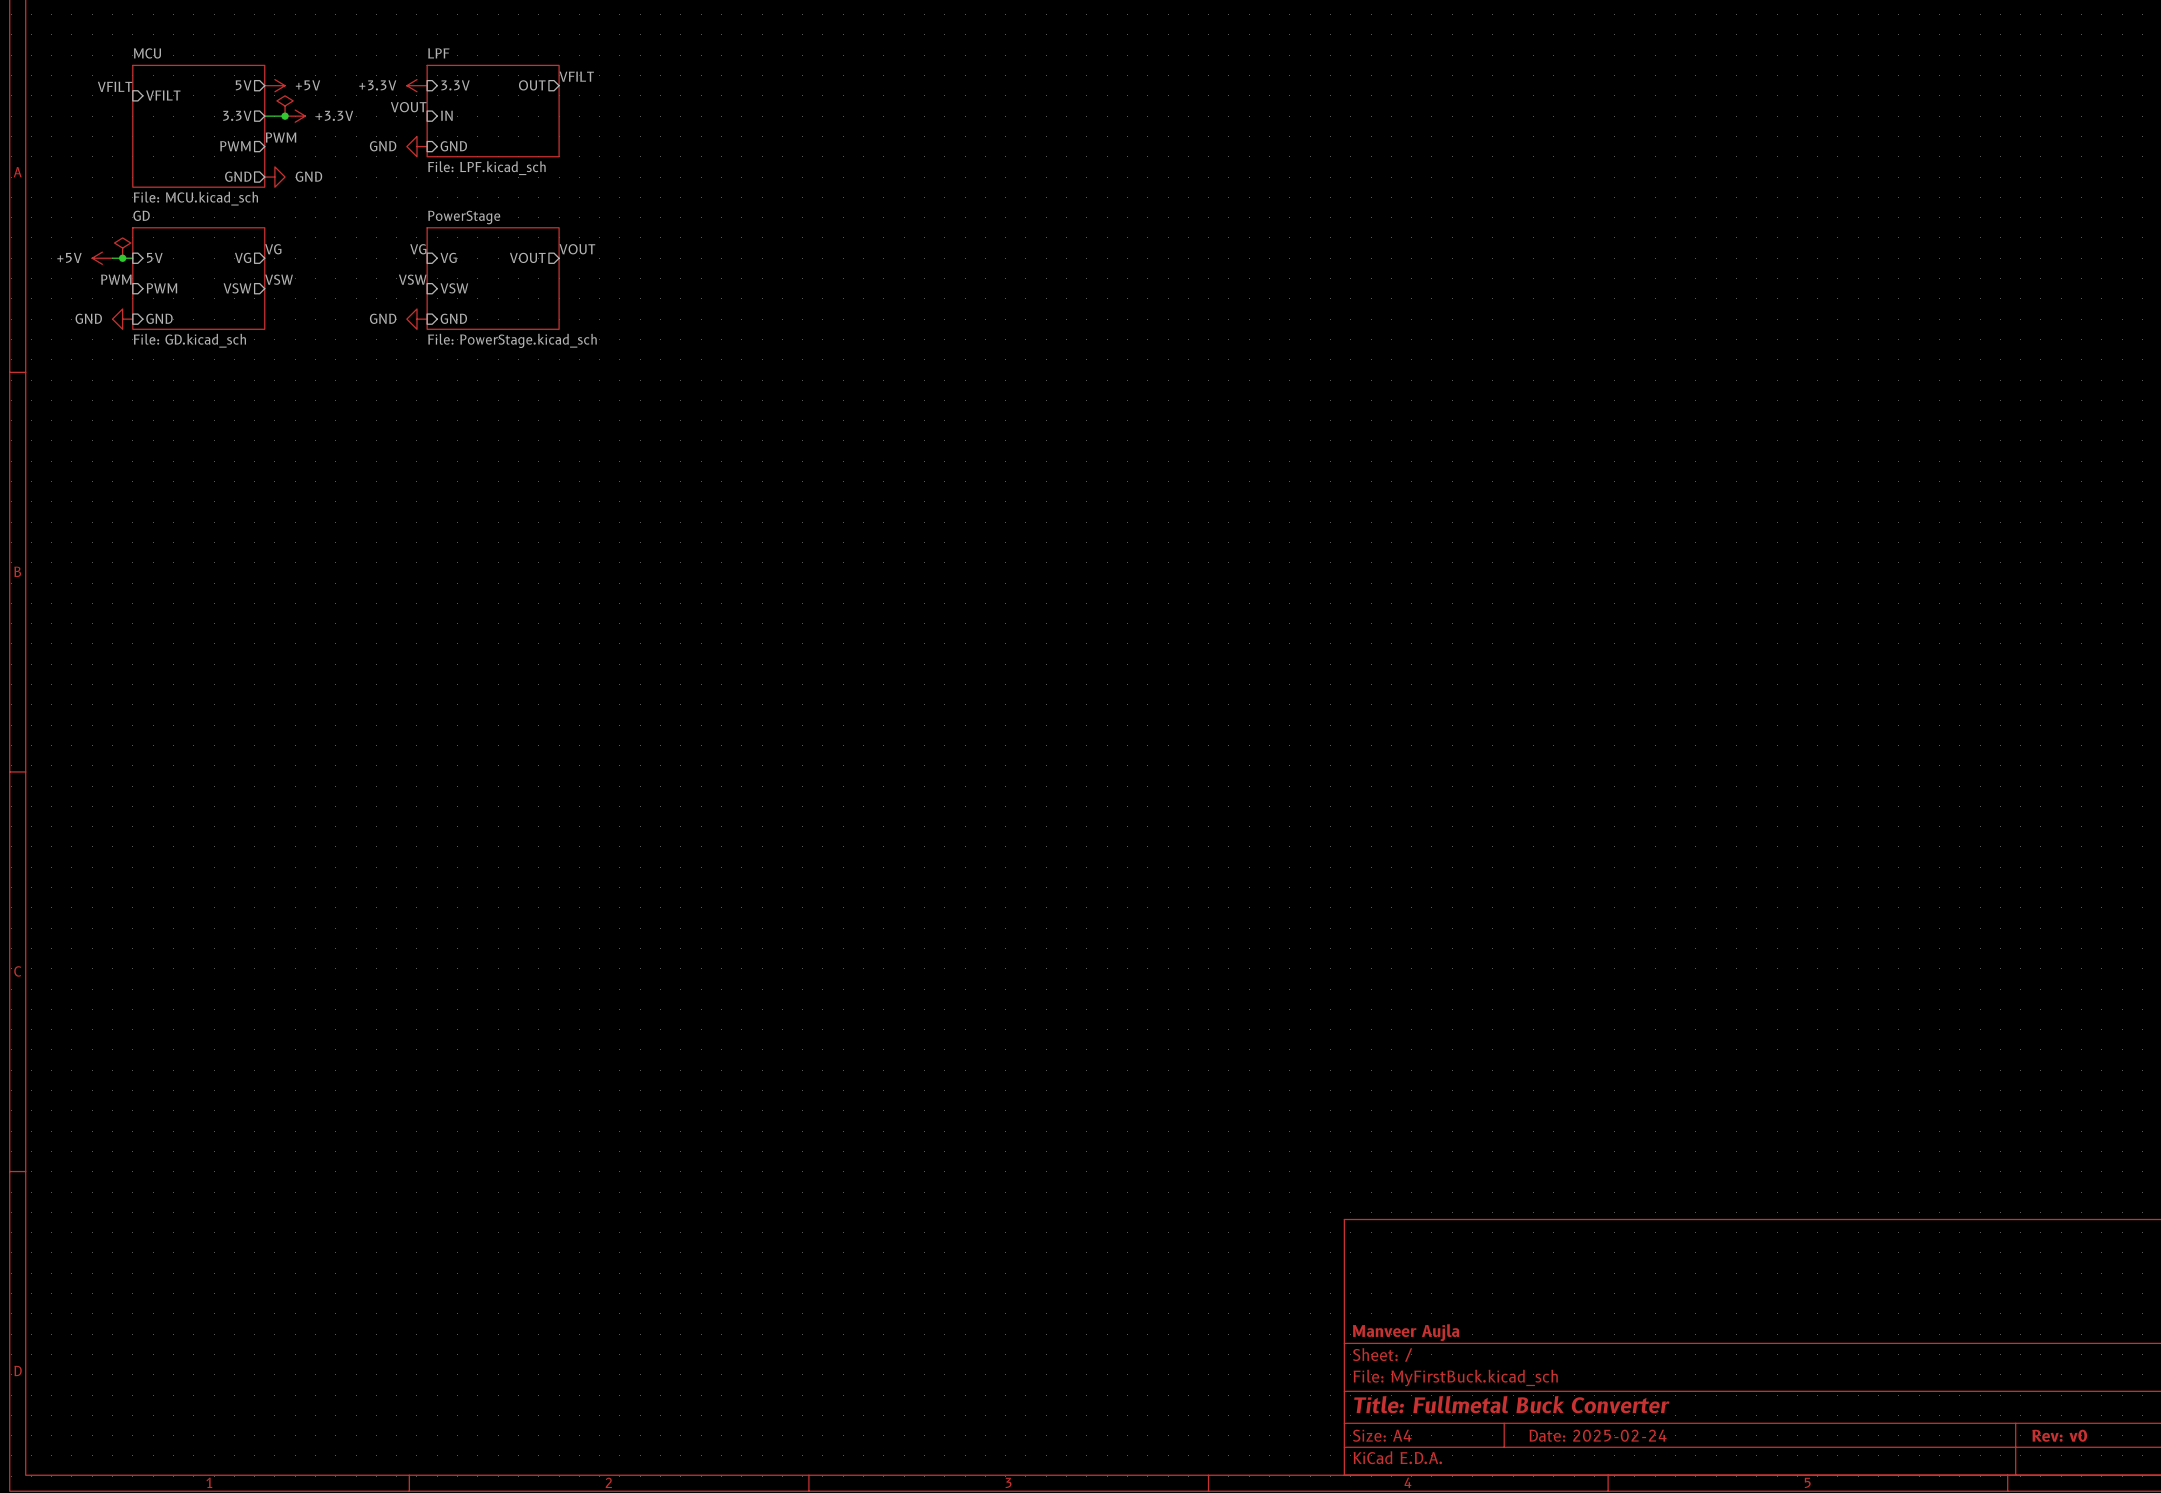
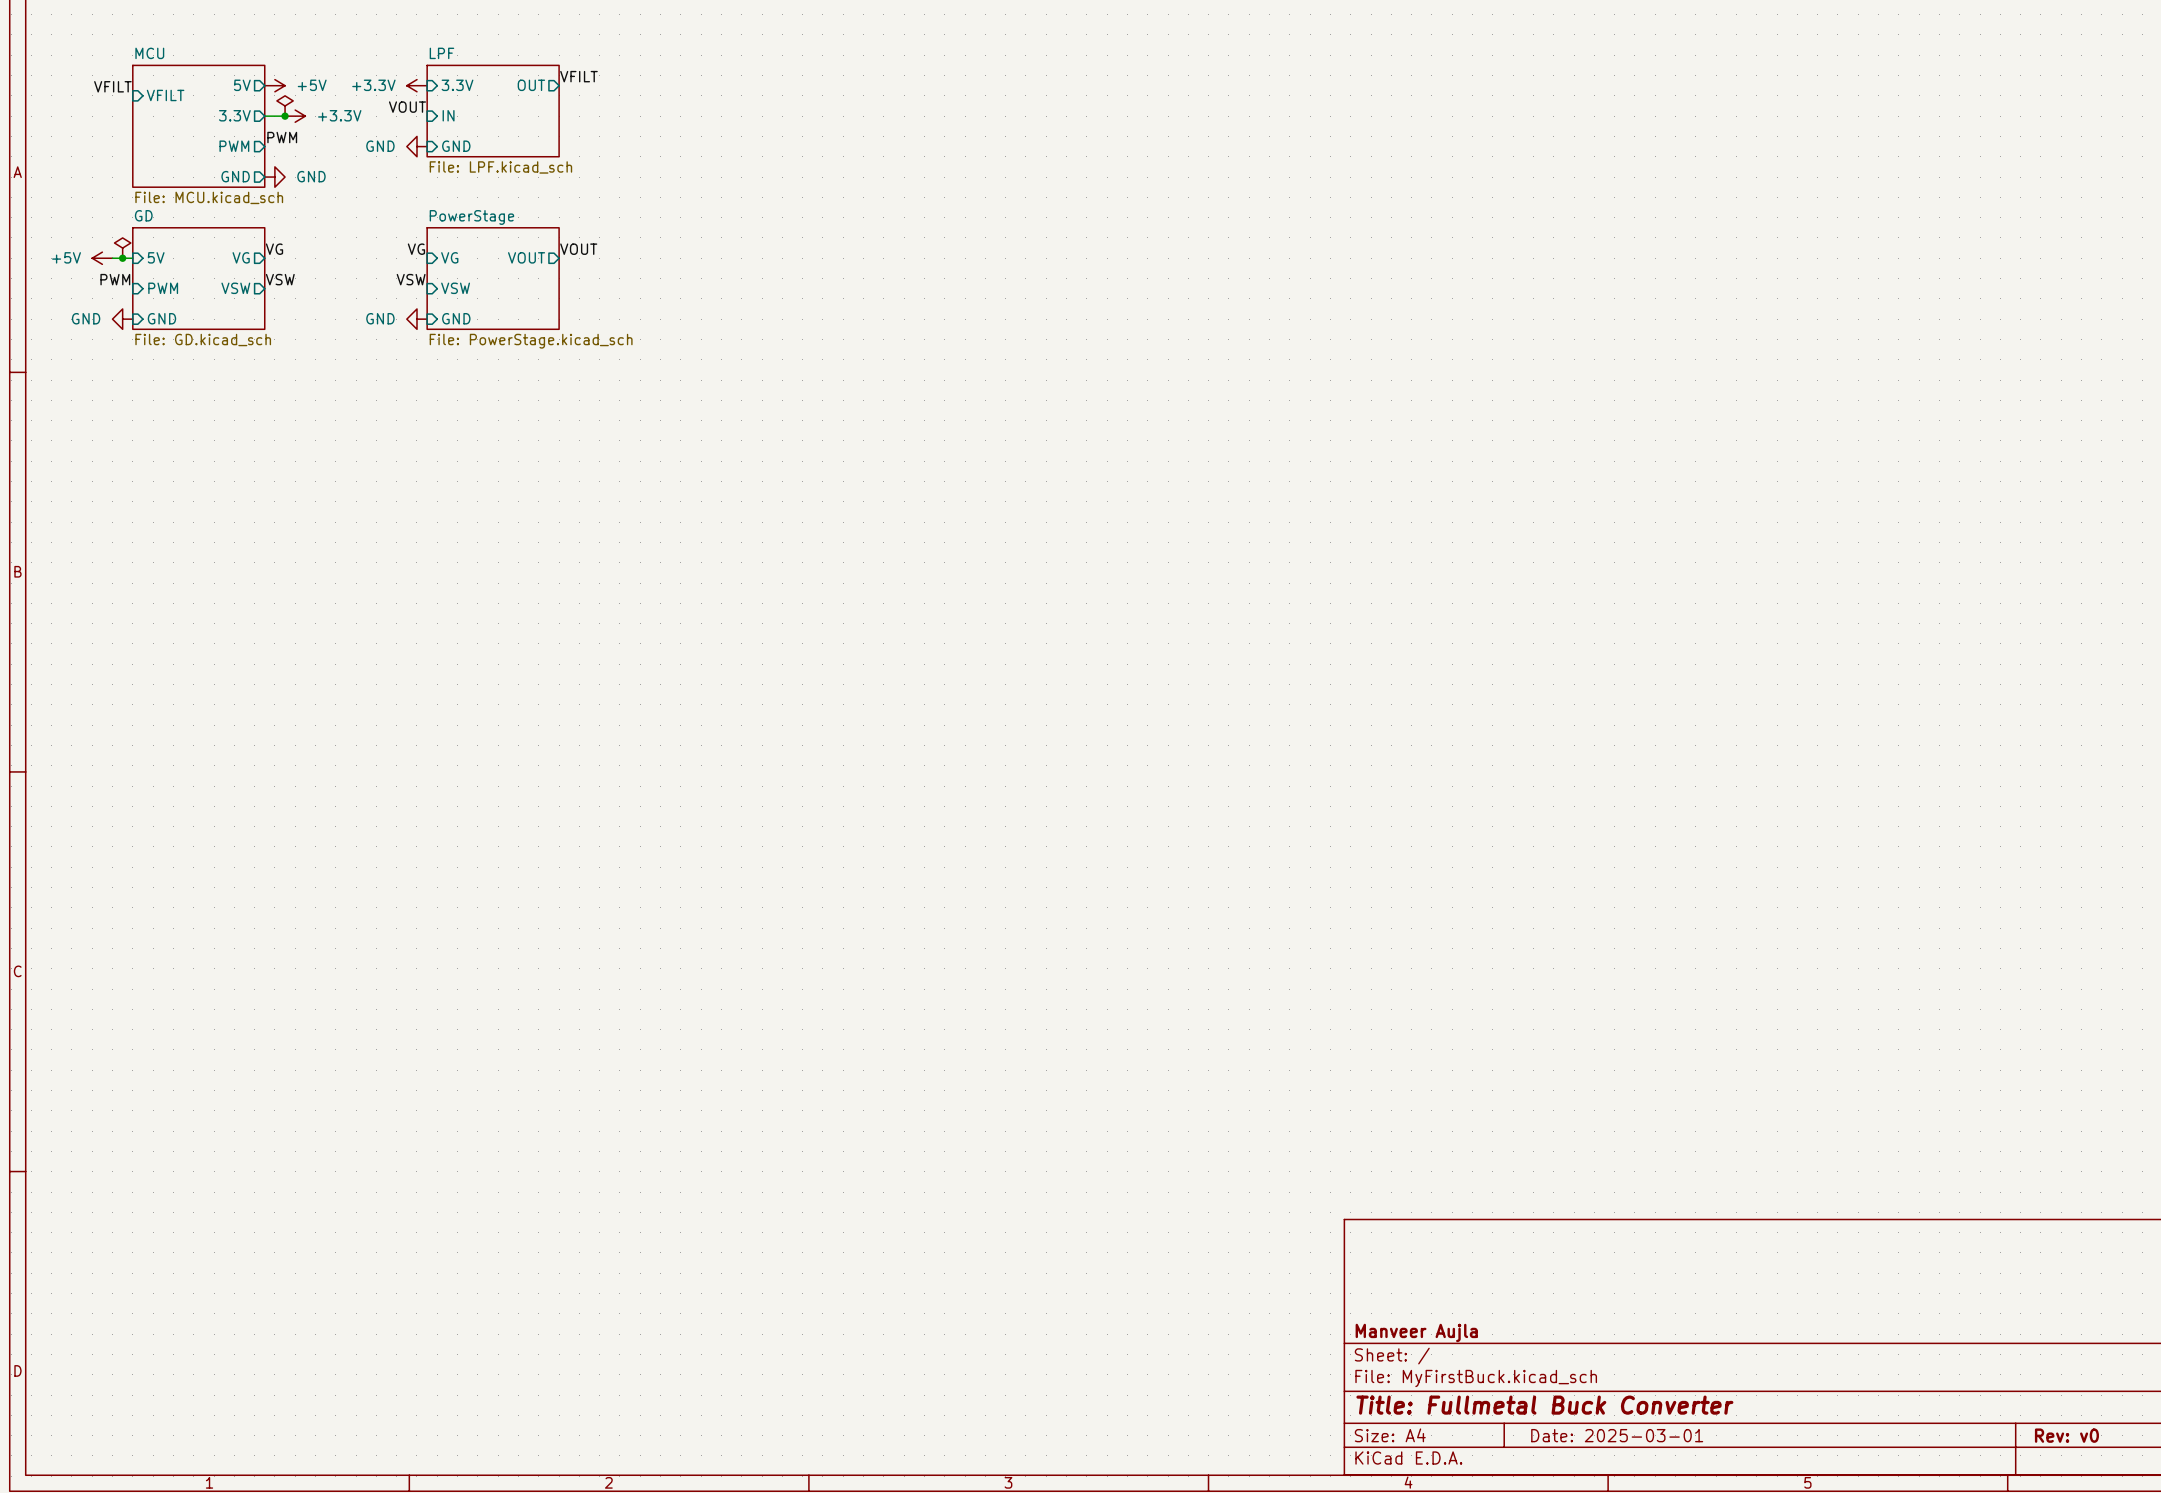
title block: Date: 2025-02-24 (1598, 1435) -> Date: 2025-03-01 (1617, 1435)

